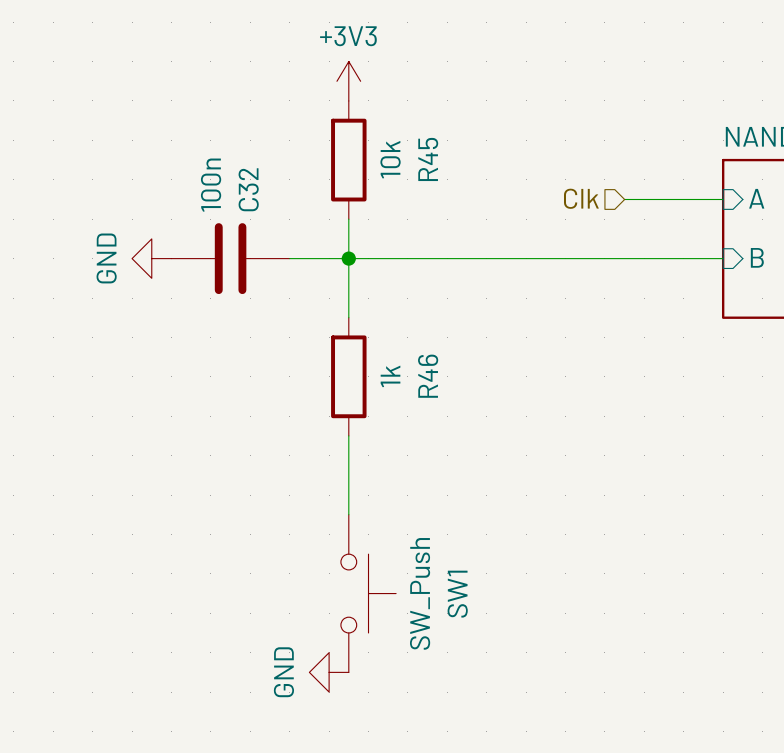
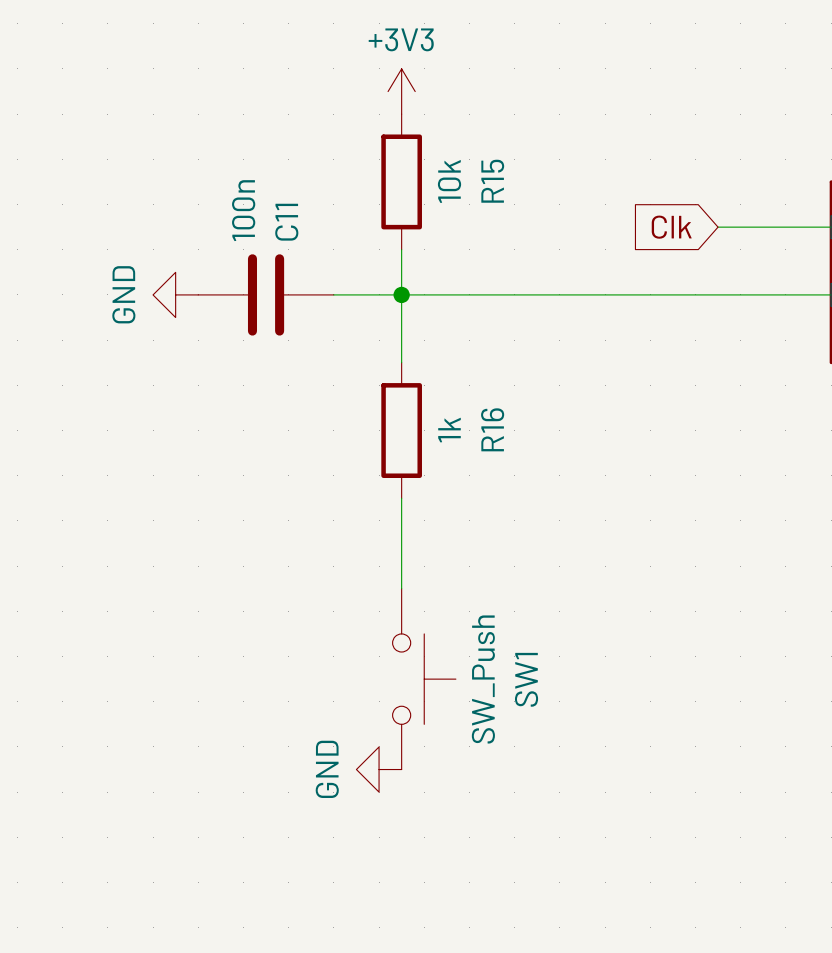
R45 name: R45 (428, 159) -> R15 (492, 181)
C32 name: C32 (248, 189) -> C11 (286, 222)
hierarchical label: Clk (581, 198) -> none
global label: none -> Clk (671, 227)
R46 name: R46 (428, 376) -> R16 (492, 429)

